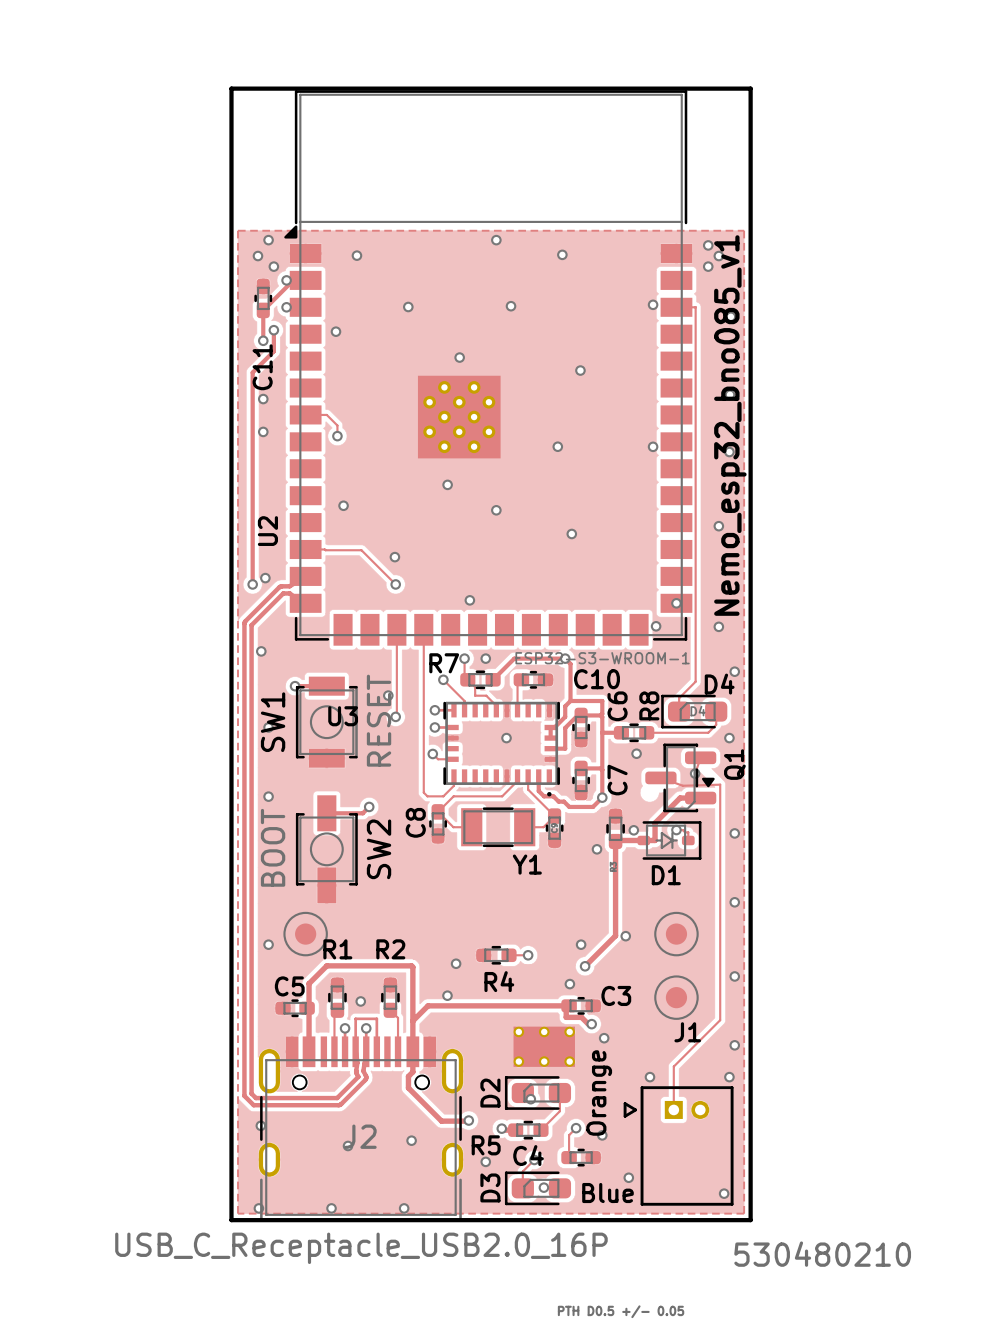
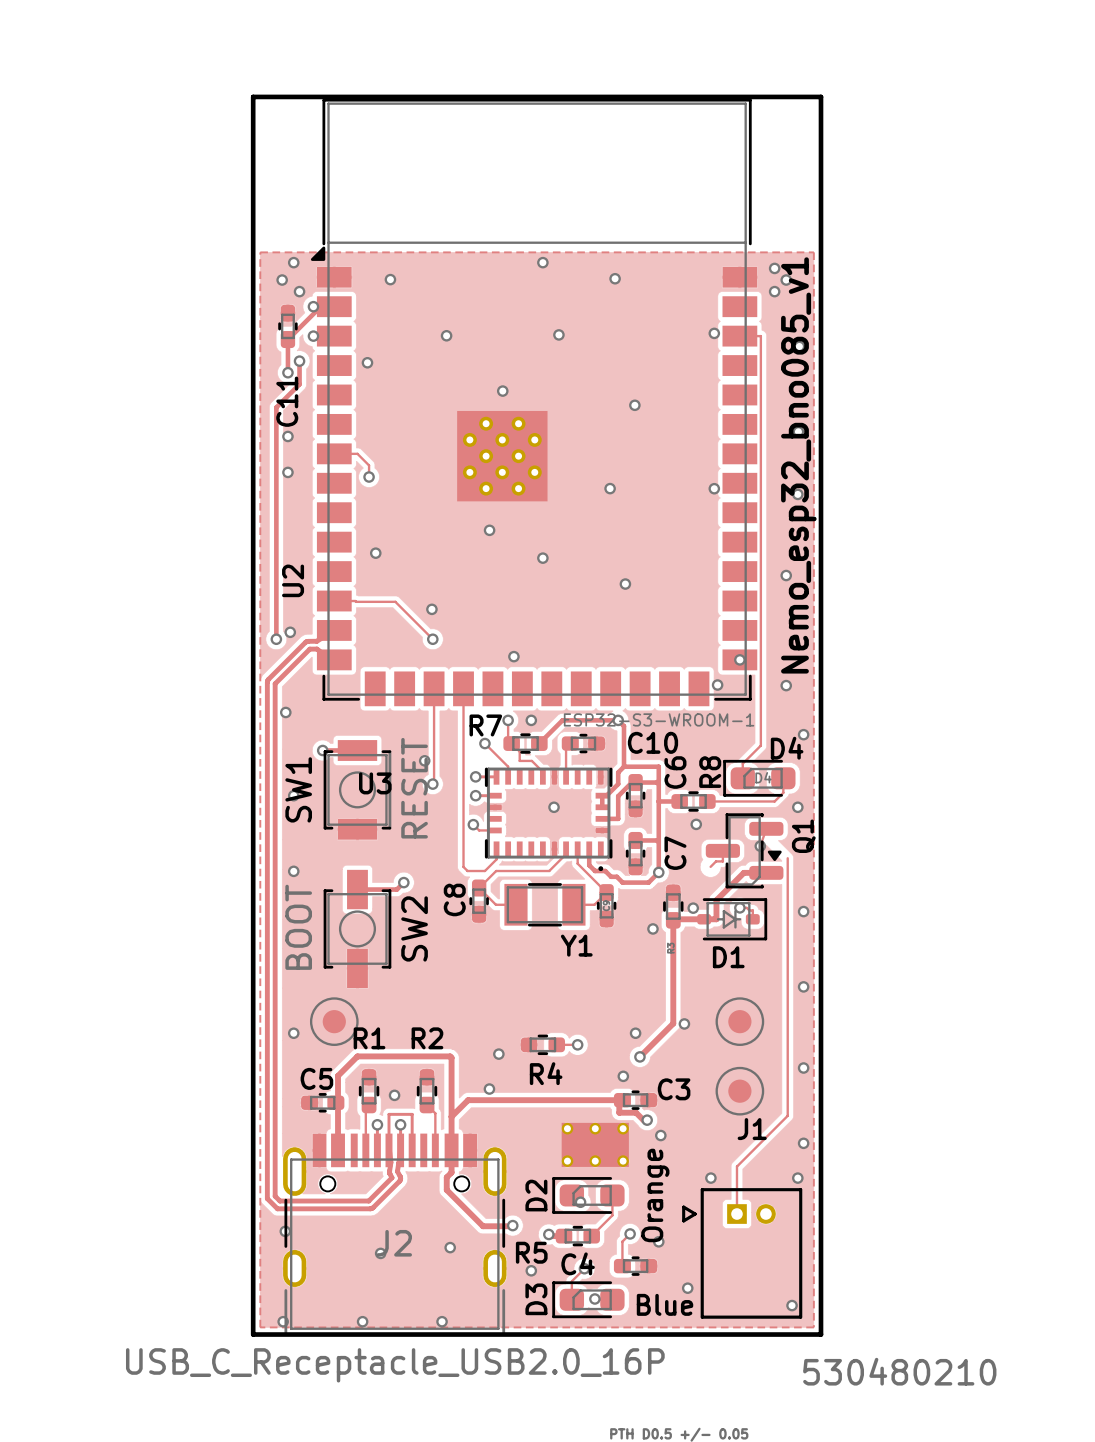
track: (660, 777) (682, 785) (720, 784) -> (722, 850) (722, 861) (716, 861) (710, 866)

